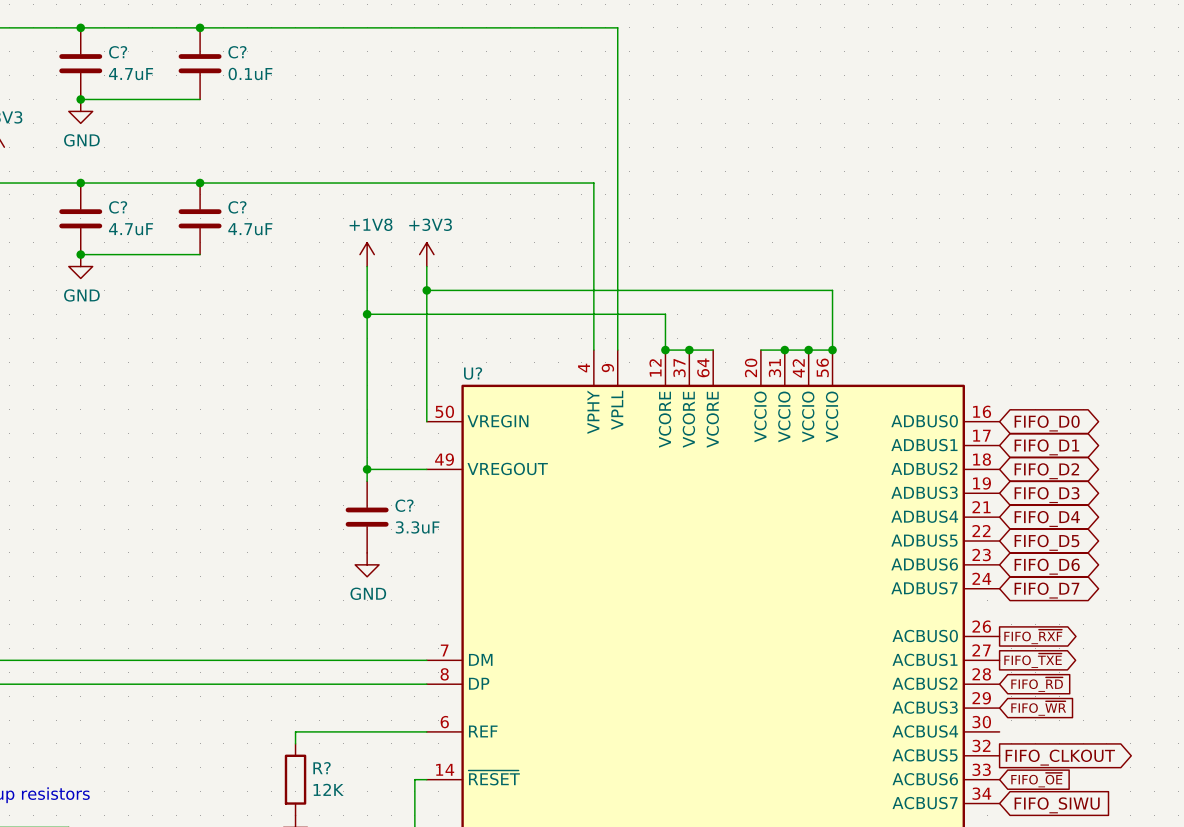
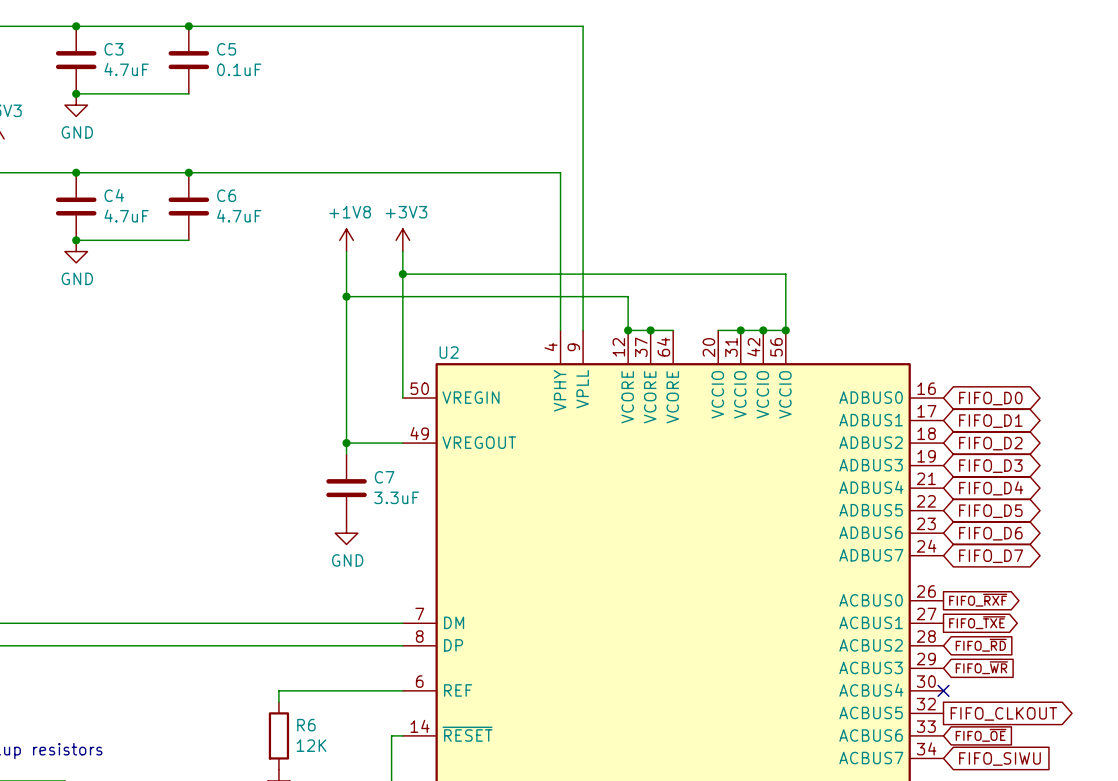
C? name: C? (118, 52) -> C3 (114, 49)
C? name: C? (237, 52) -> C5 (226, 49)
C? name: C? (118, 207) -> C4 (114, 195)
C? name: C? (237, 207) -> C6 (226, 195)
U? name: U? (473, 373) -> U2 (449, 352)
C? name: C? (404, 505) -> C7 (384, 477)
no-connect mark: none -> (943, 690)
R? name: R? (322, 768) -> R6 (306, 725)

